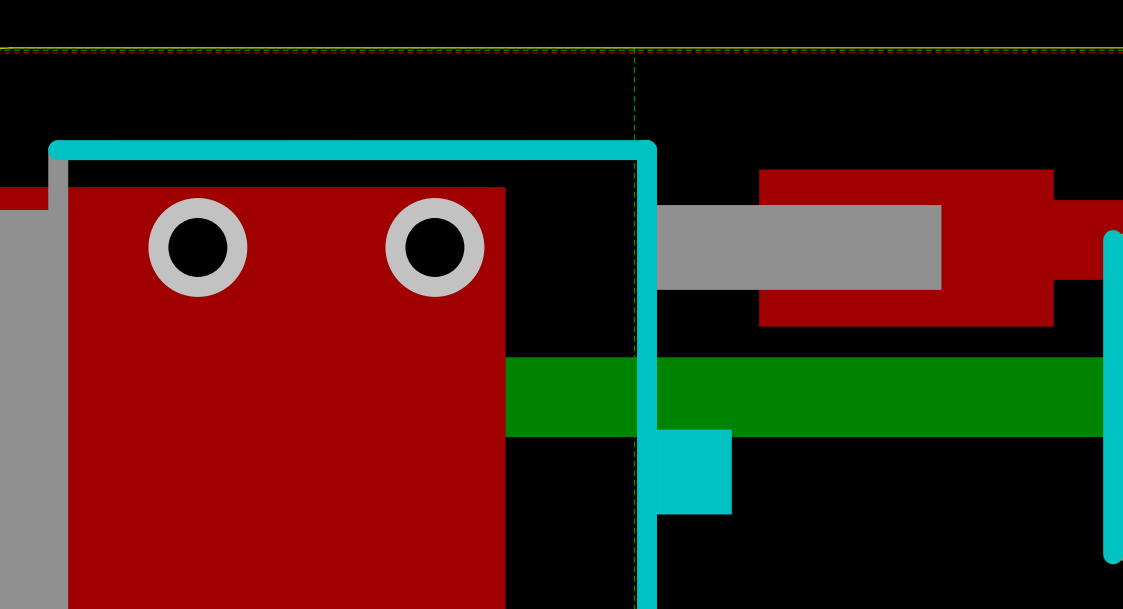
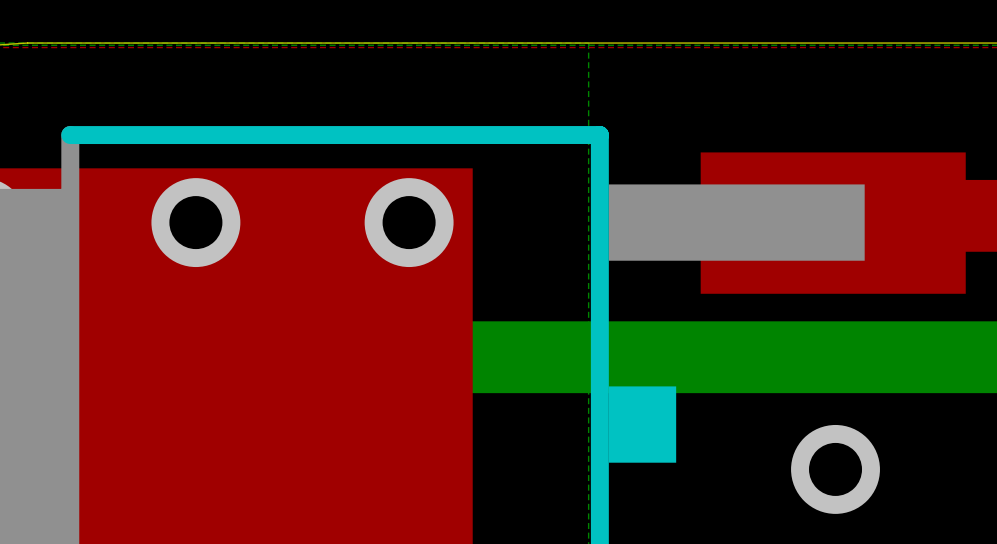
via: none -> (835, 469)

